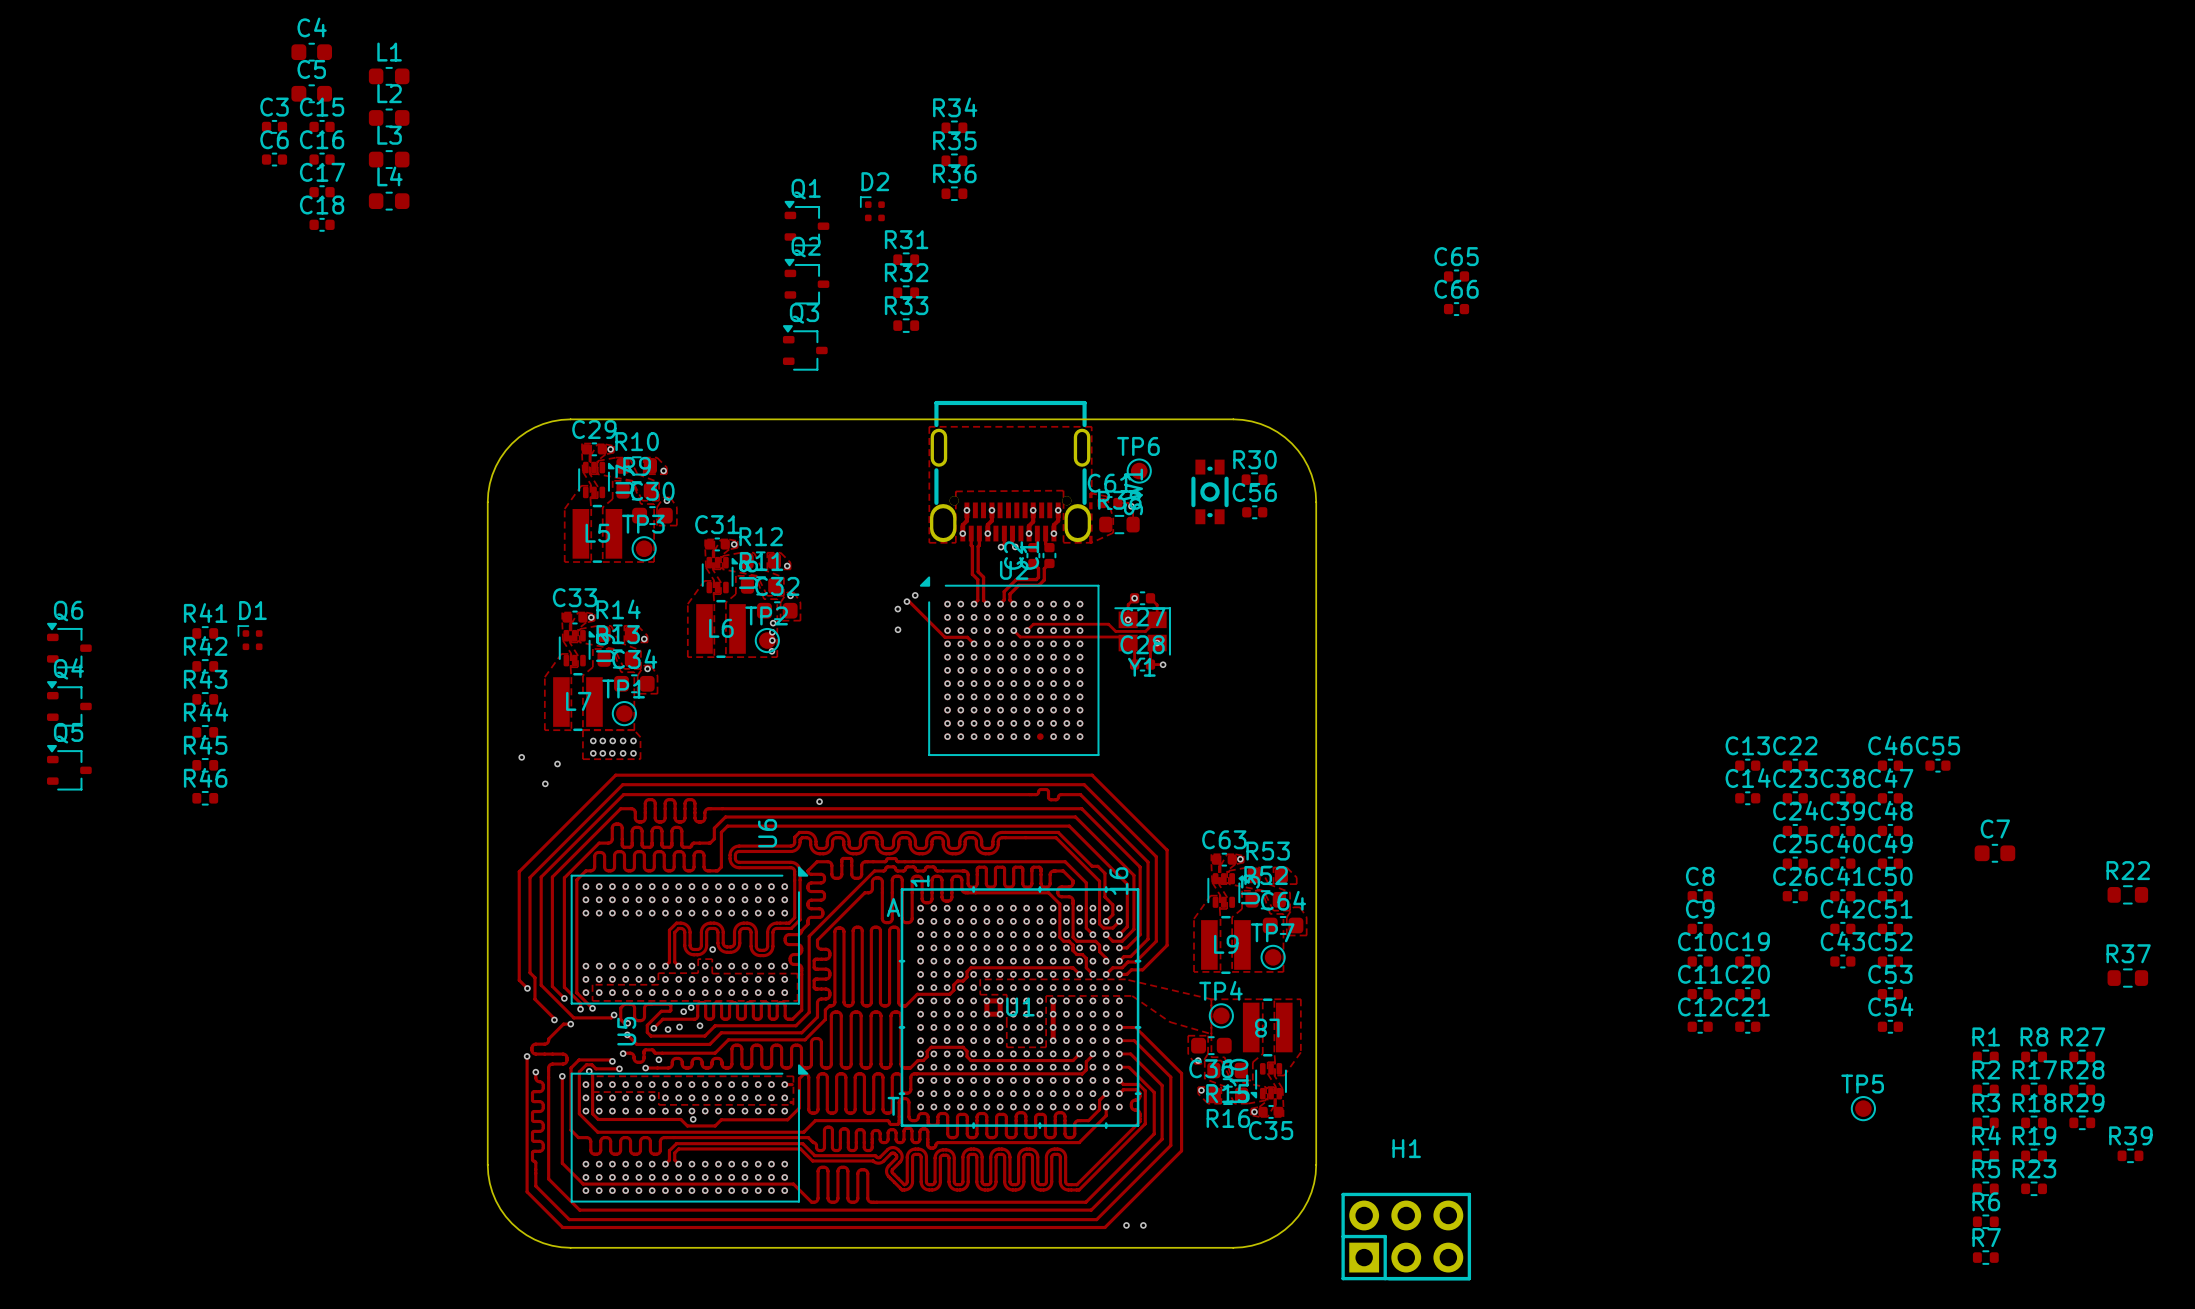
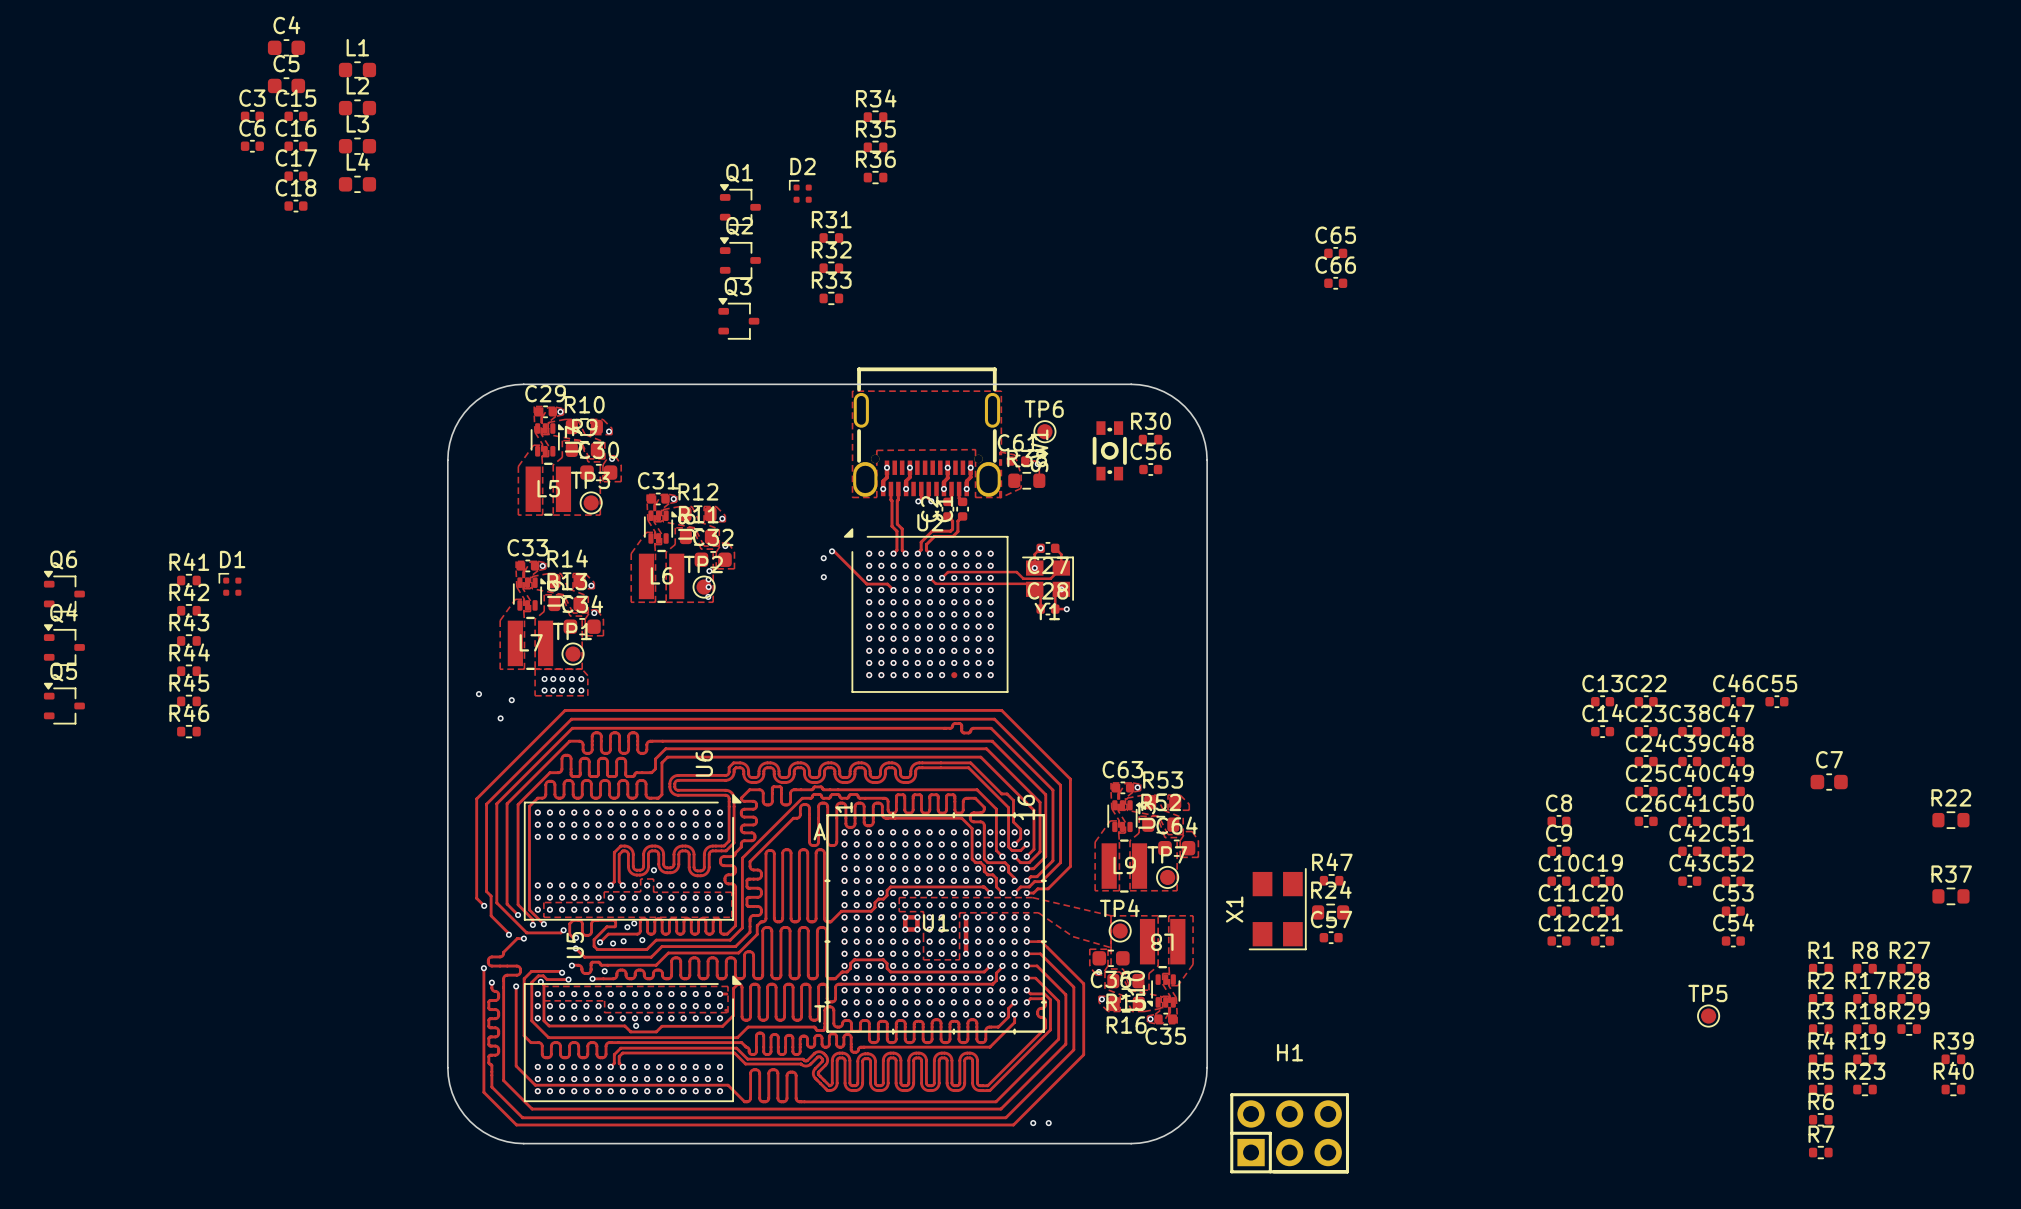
via: (915, 595) -> none
via: (819, 801) -> none
R47: none -> (1331, 880)
X1: none -> (1277, 909)
R24: none -> (1330, 912)
C57: none -> (1331, 937)
R40: none -> (1953, 1089)

